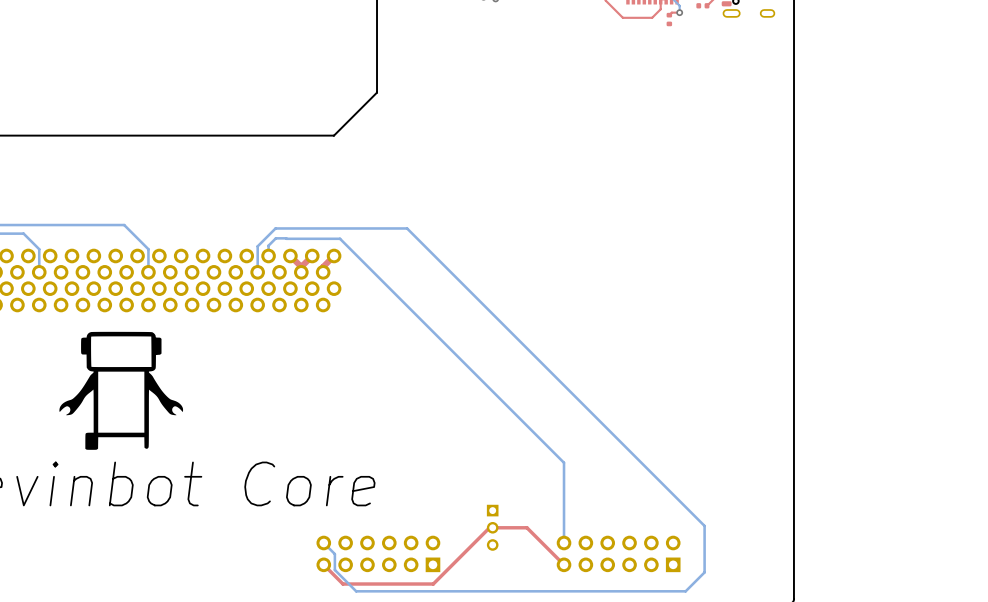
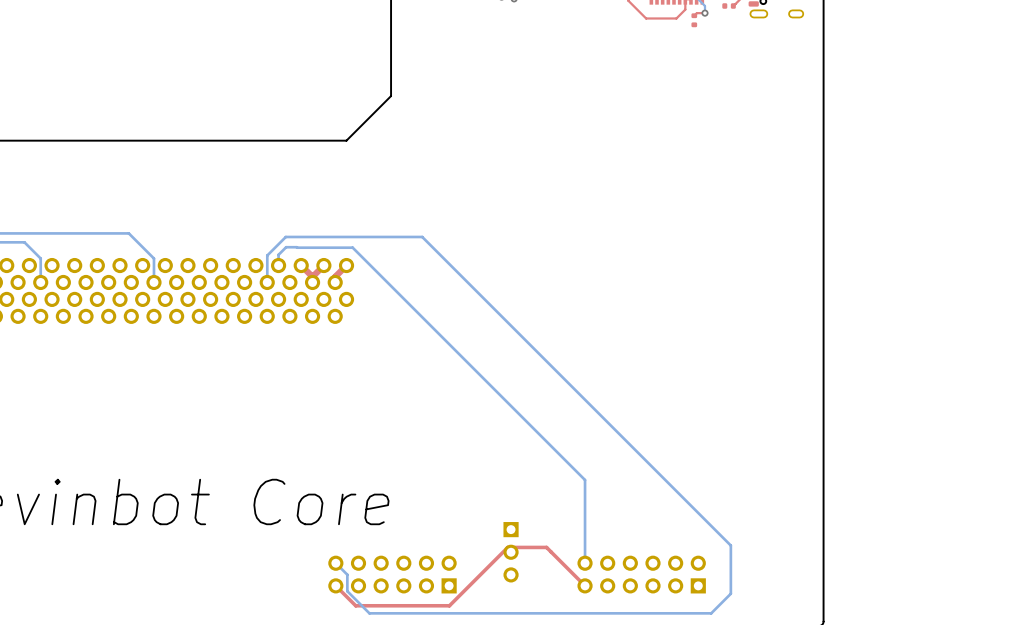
drawing: [59, 331, 184, 450] -> none
part footprint: [486, 504, 499, 551] -> [503, 522, 519, 583]

